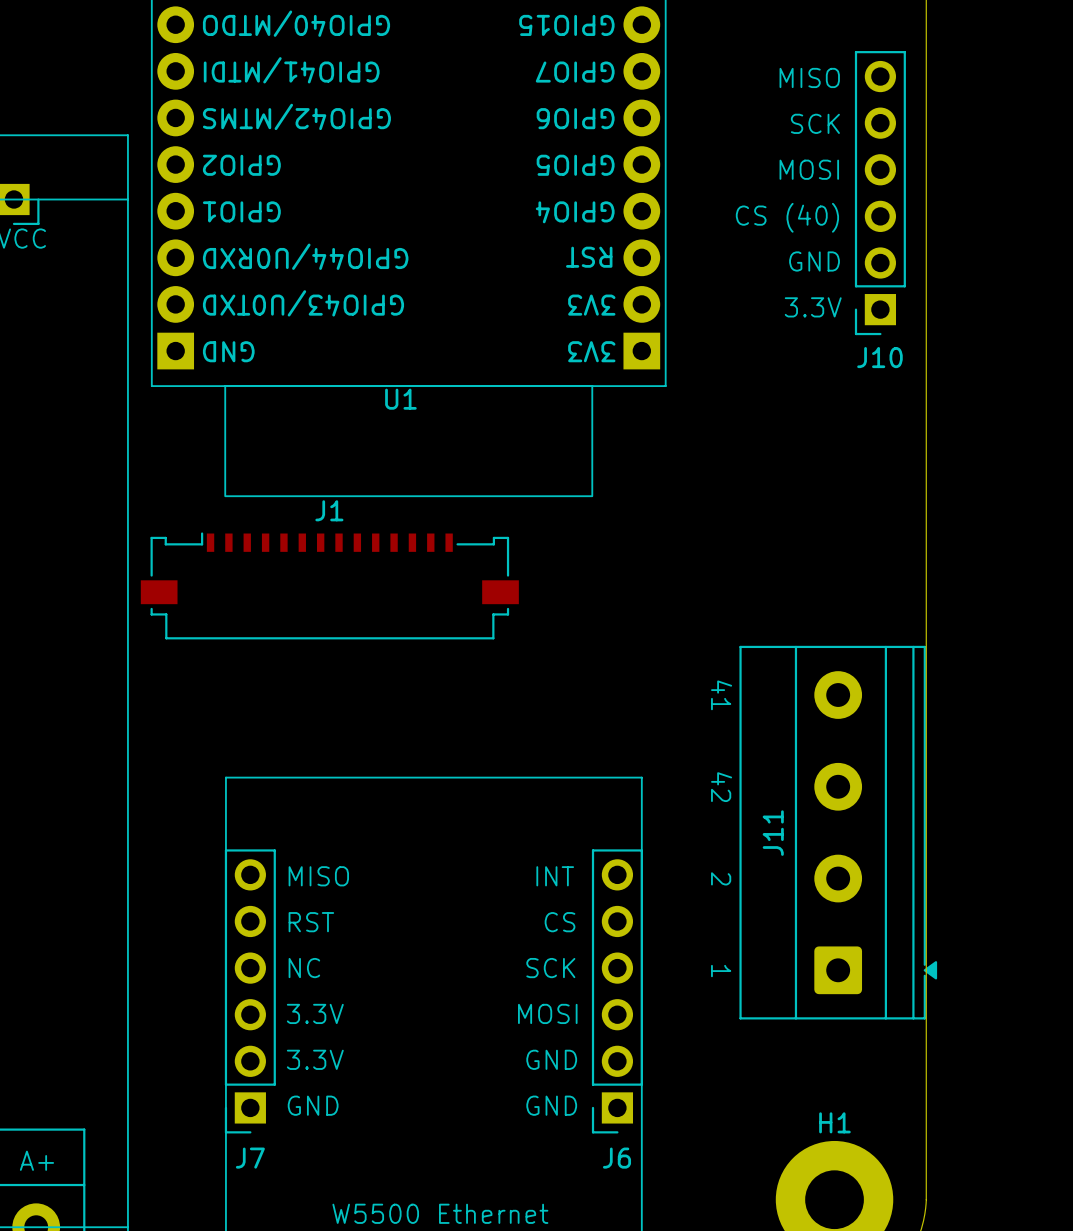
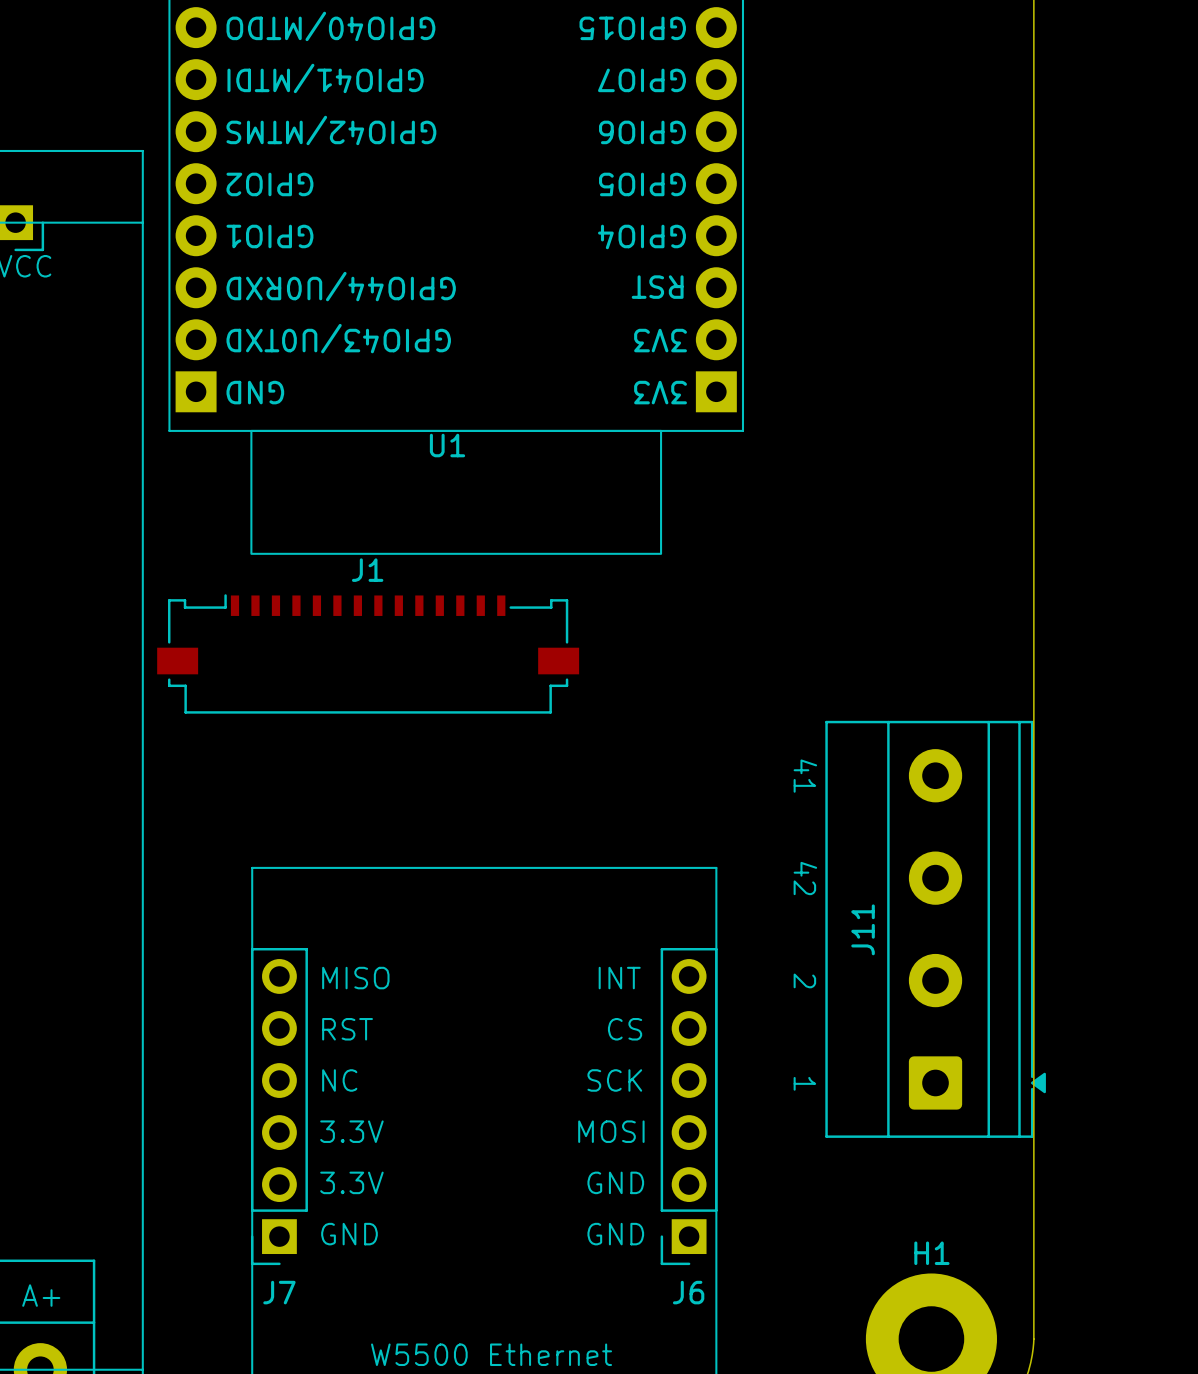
text: MISO (809, 77) -> none
text: SCK (815, 123) -> none
text: MOSI (809, 169) -> none
J10: (880, 193) -> none
text: CS (40) (787, 217) -> none
text: GND (814, 261) -> none
text: 3.3V (813, 307) -> none

